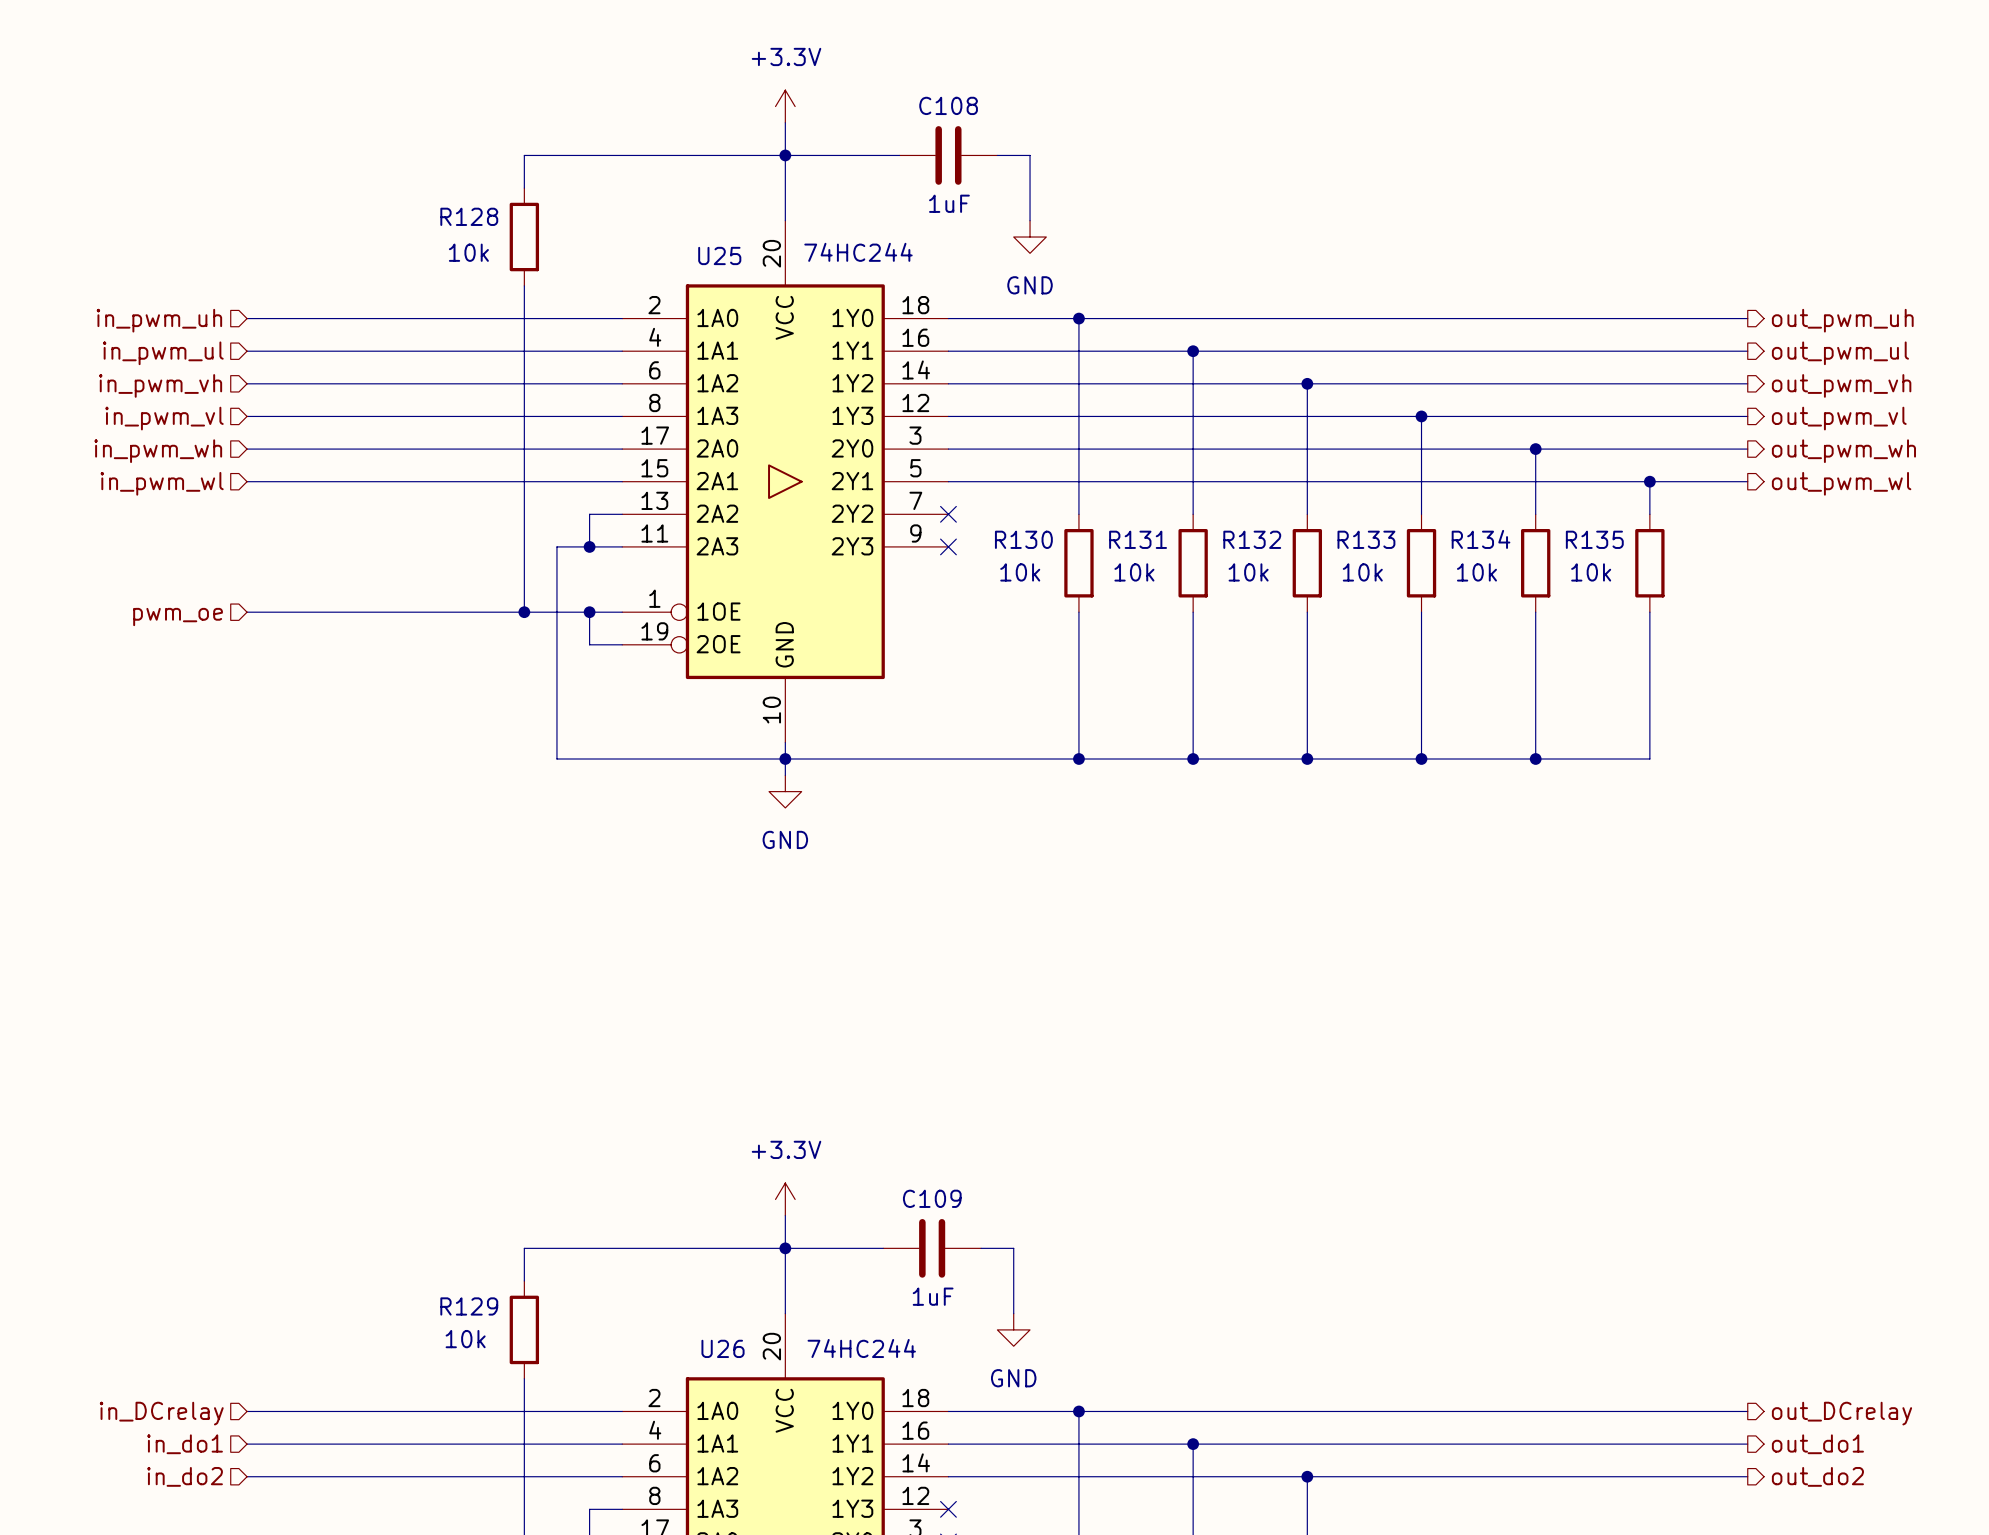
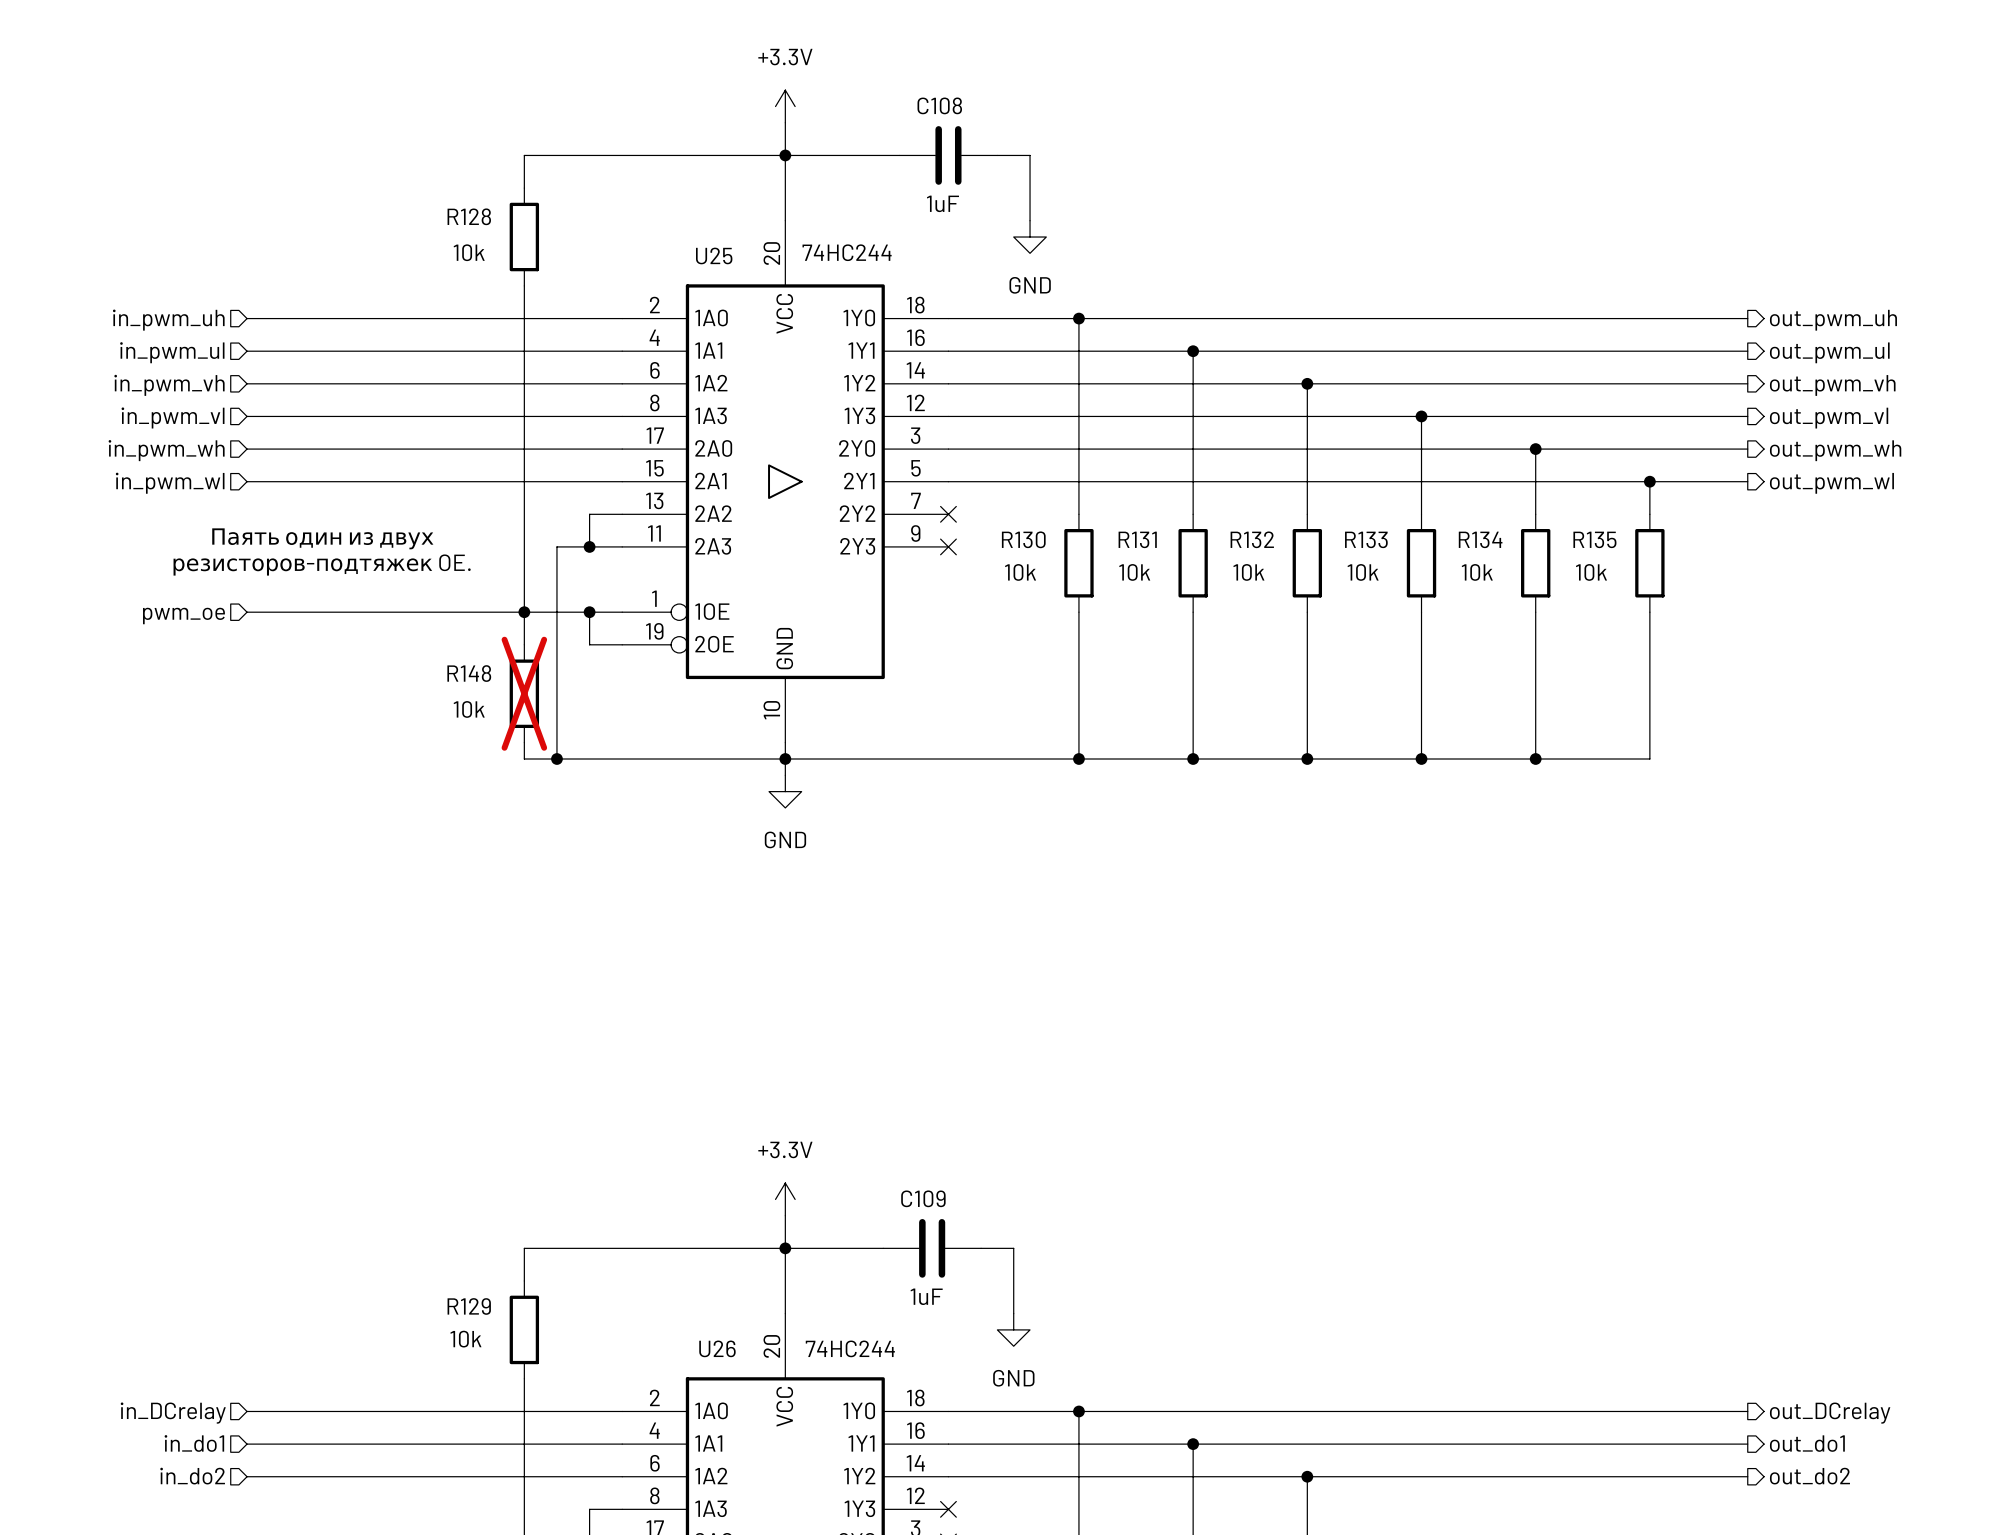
text: none -> Паять один из двух (322, 538)
text: none -> резисторов-подтяжек OE. (322, 565)
wire: none -> (524, 612) (524, 644)
R148: none -> 10k (524, 693)
wire: none -> (524, 742) (524, 759) (556, 759)
junction: none -> (556, 759)

